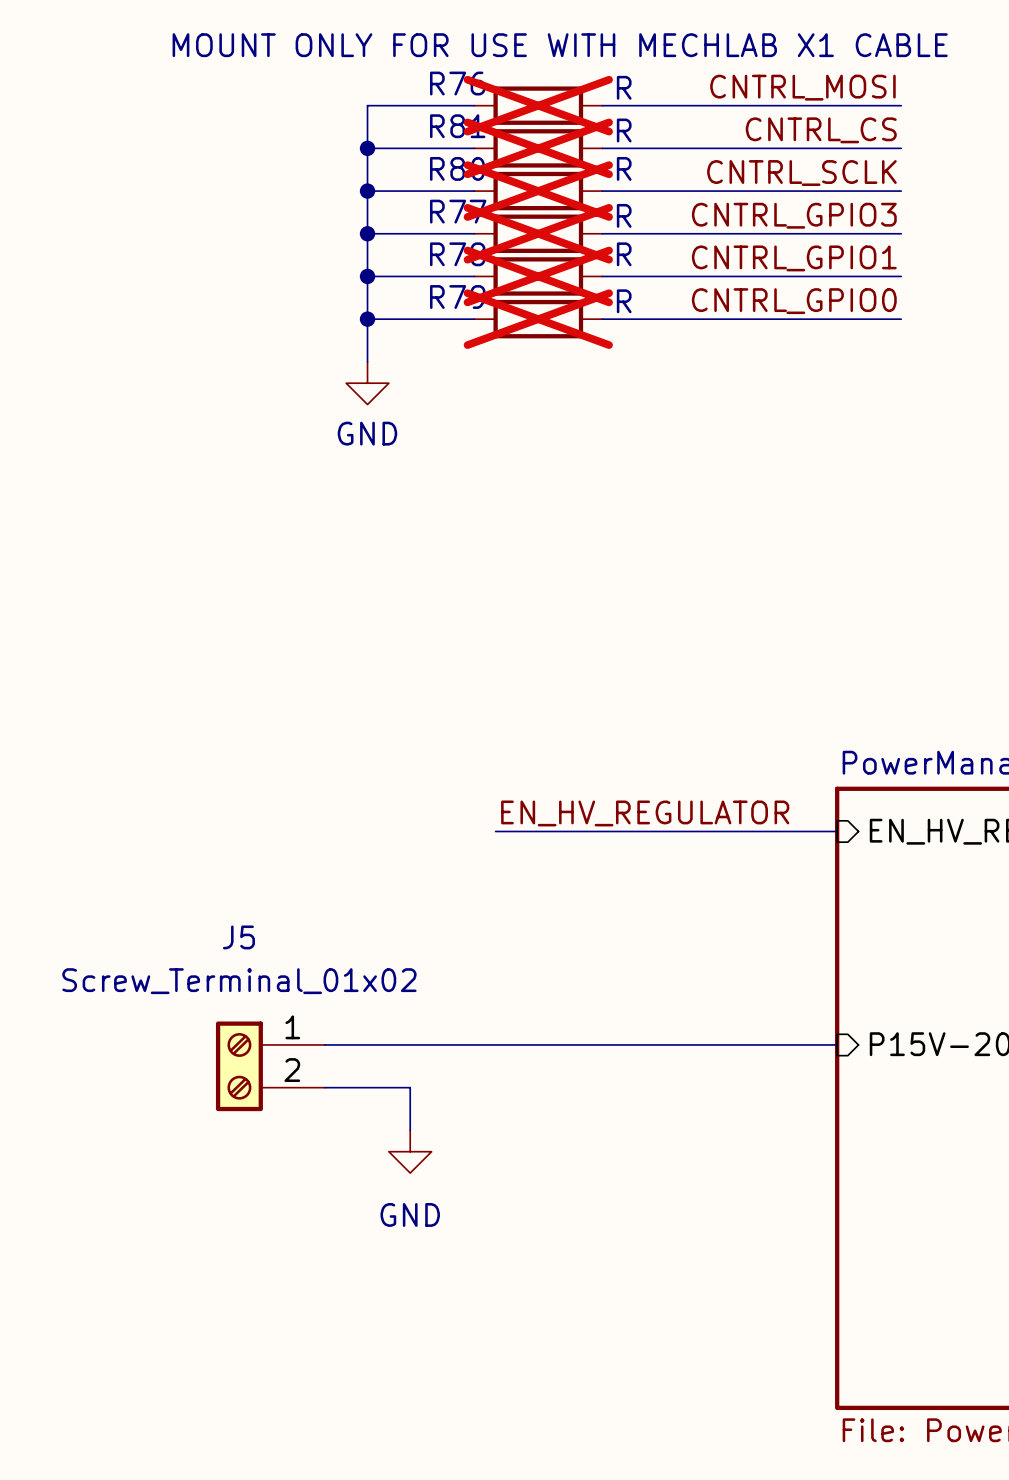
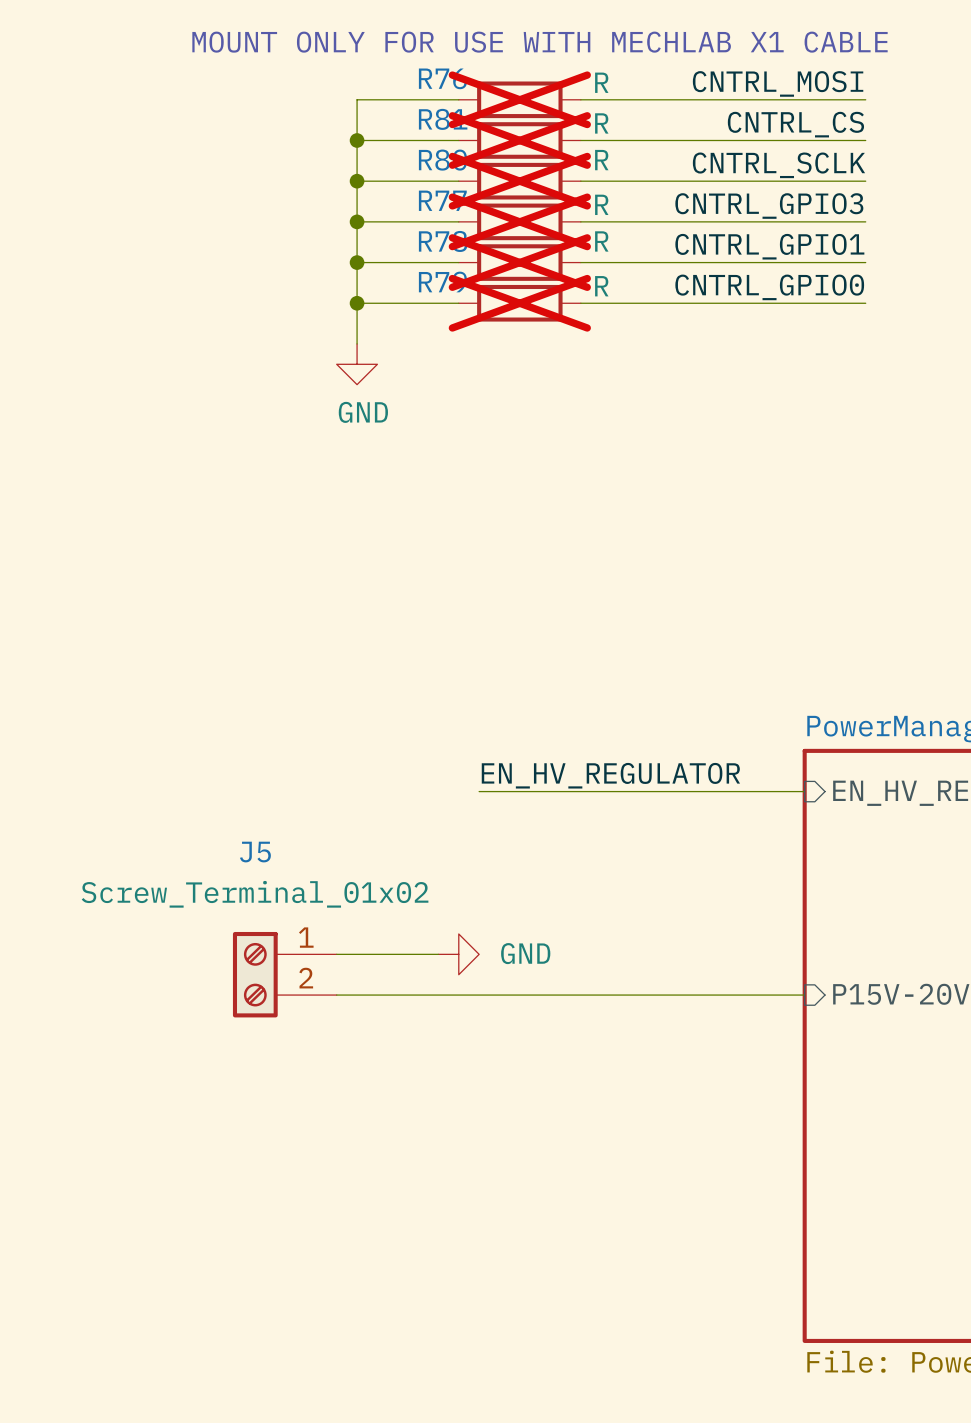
wire: none -> (336, 954) (438, 954)
J5 position: (270, 1066) -> (284, 974)
wire: (324, 1087) (410, 1087) (410, 1130) -> none
power symbol rotation: 0° (410, 1151) -> 90° counterclockwise (458, 954)
power symbol position: GND (410, 1151) -> GND (458, 954)

